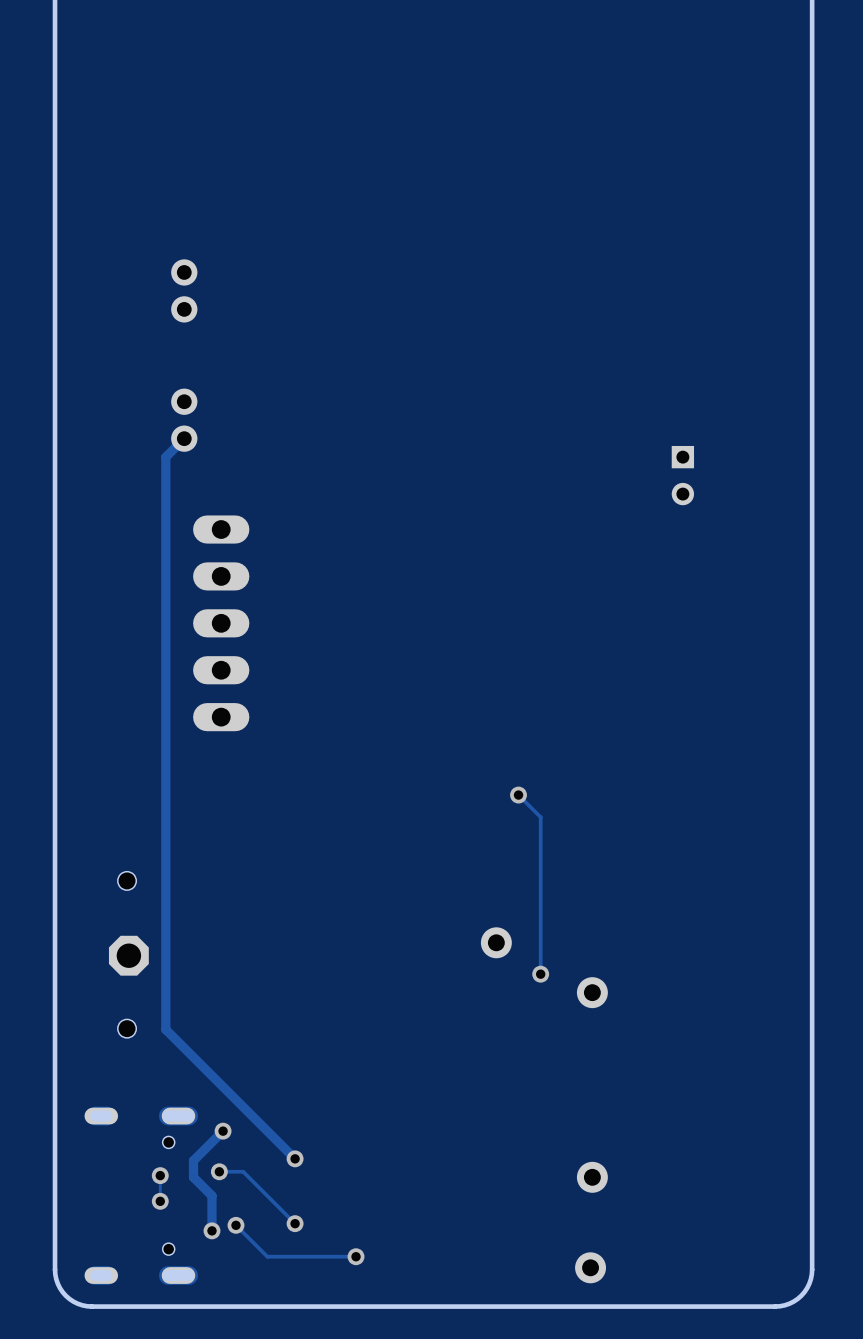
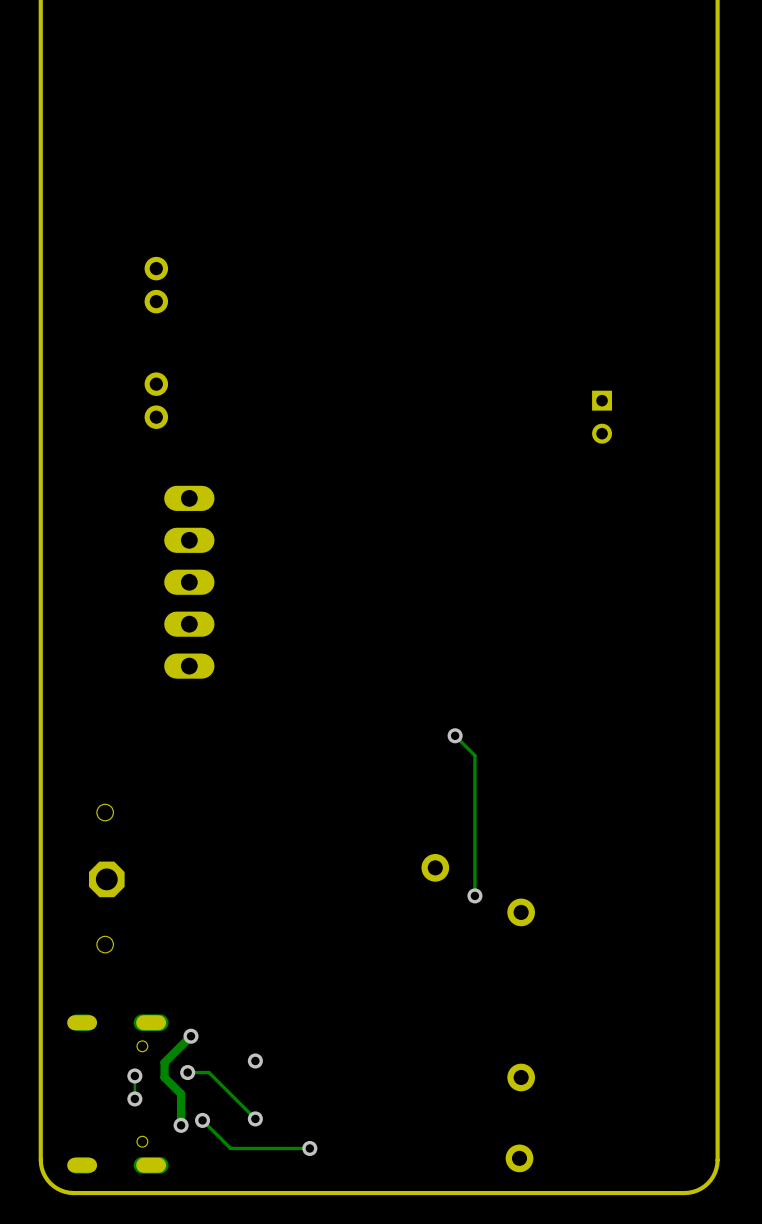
track: (184, 438) (165, 457) (165, 1029) (295, 1158) -> none
part position: (682, 475) -> (602, 417)

